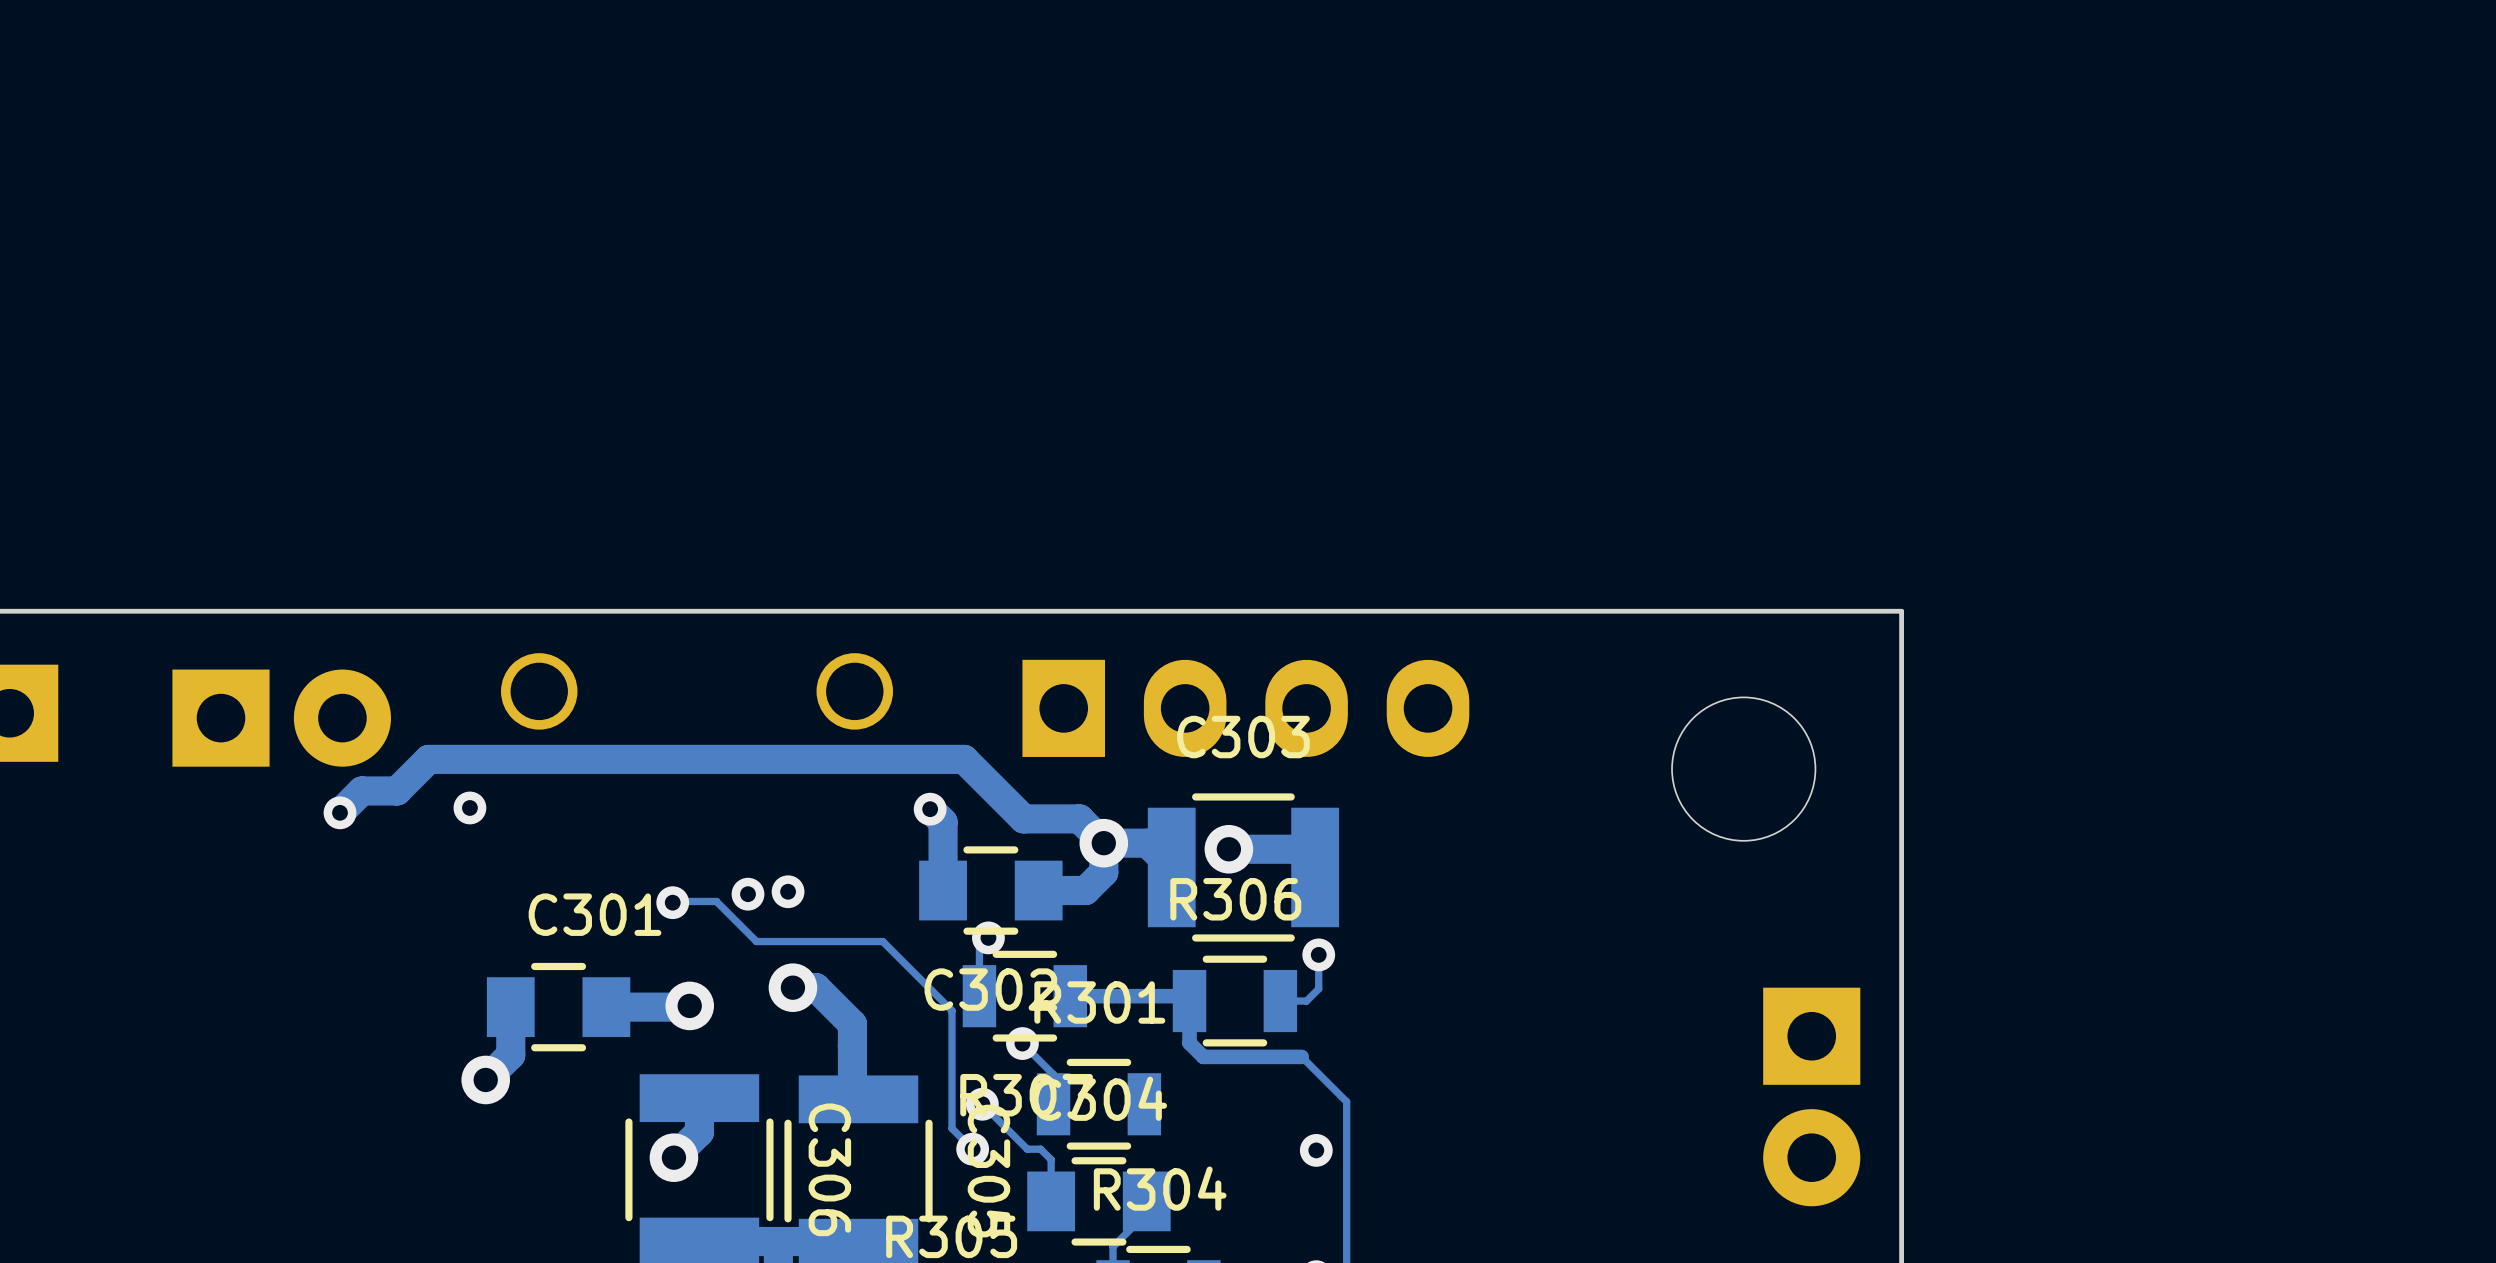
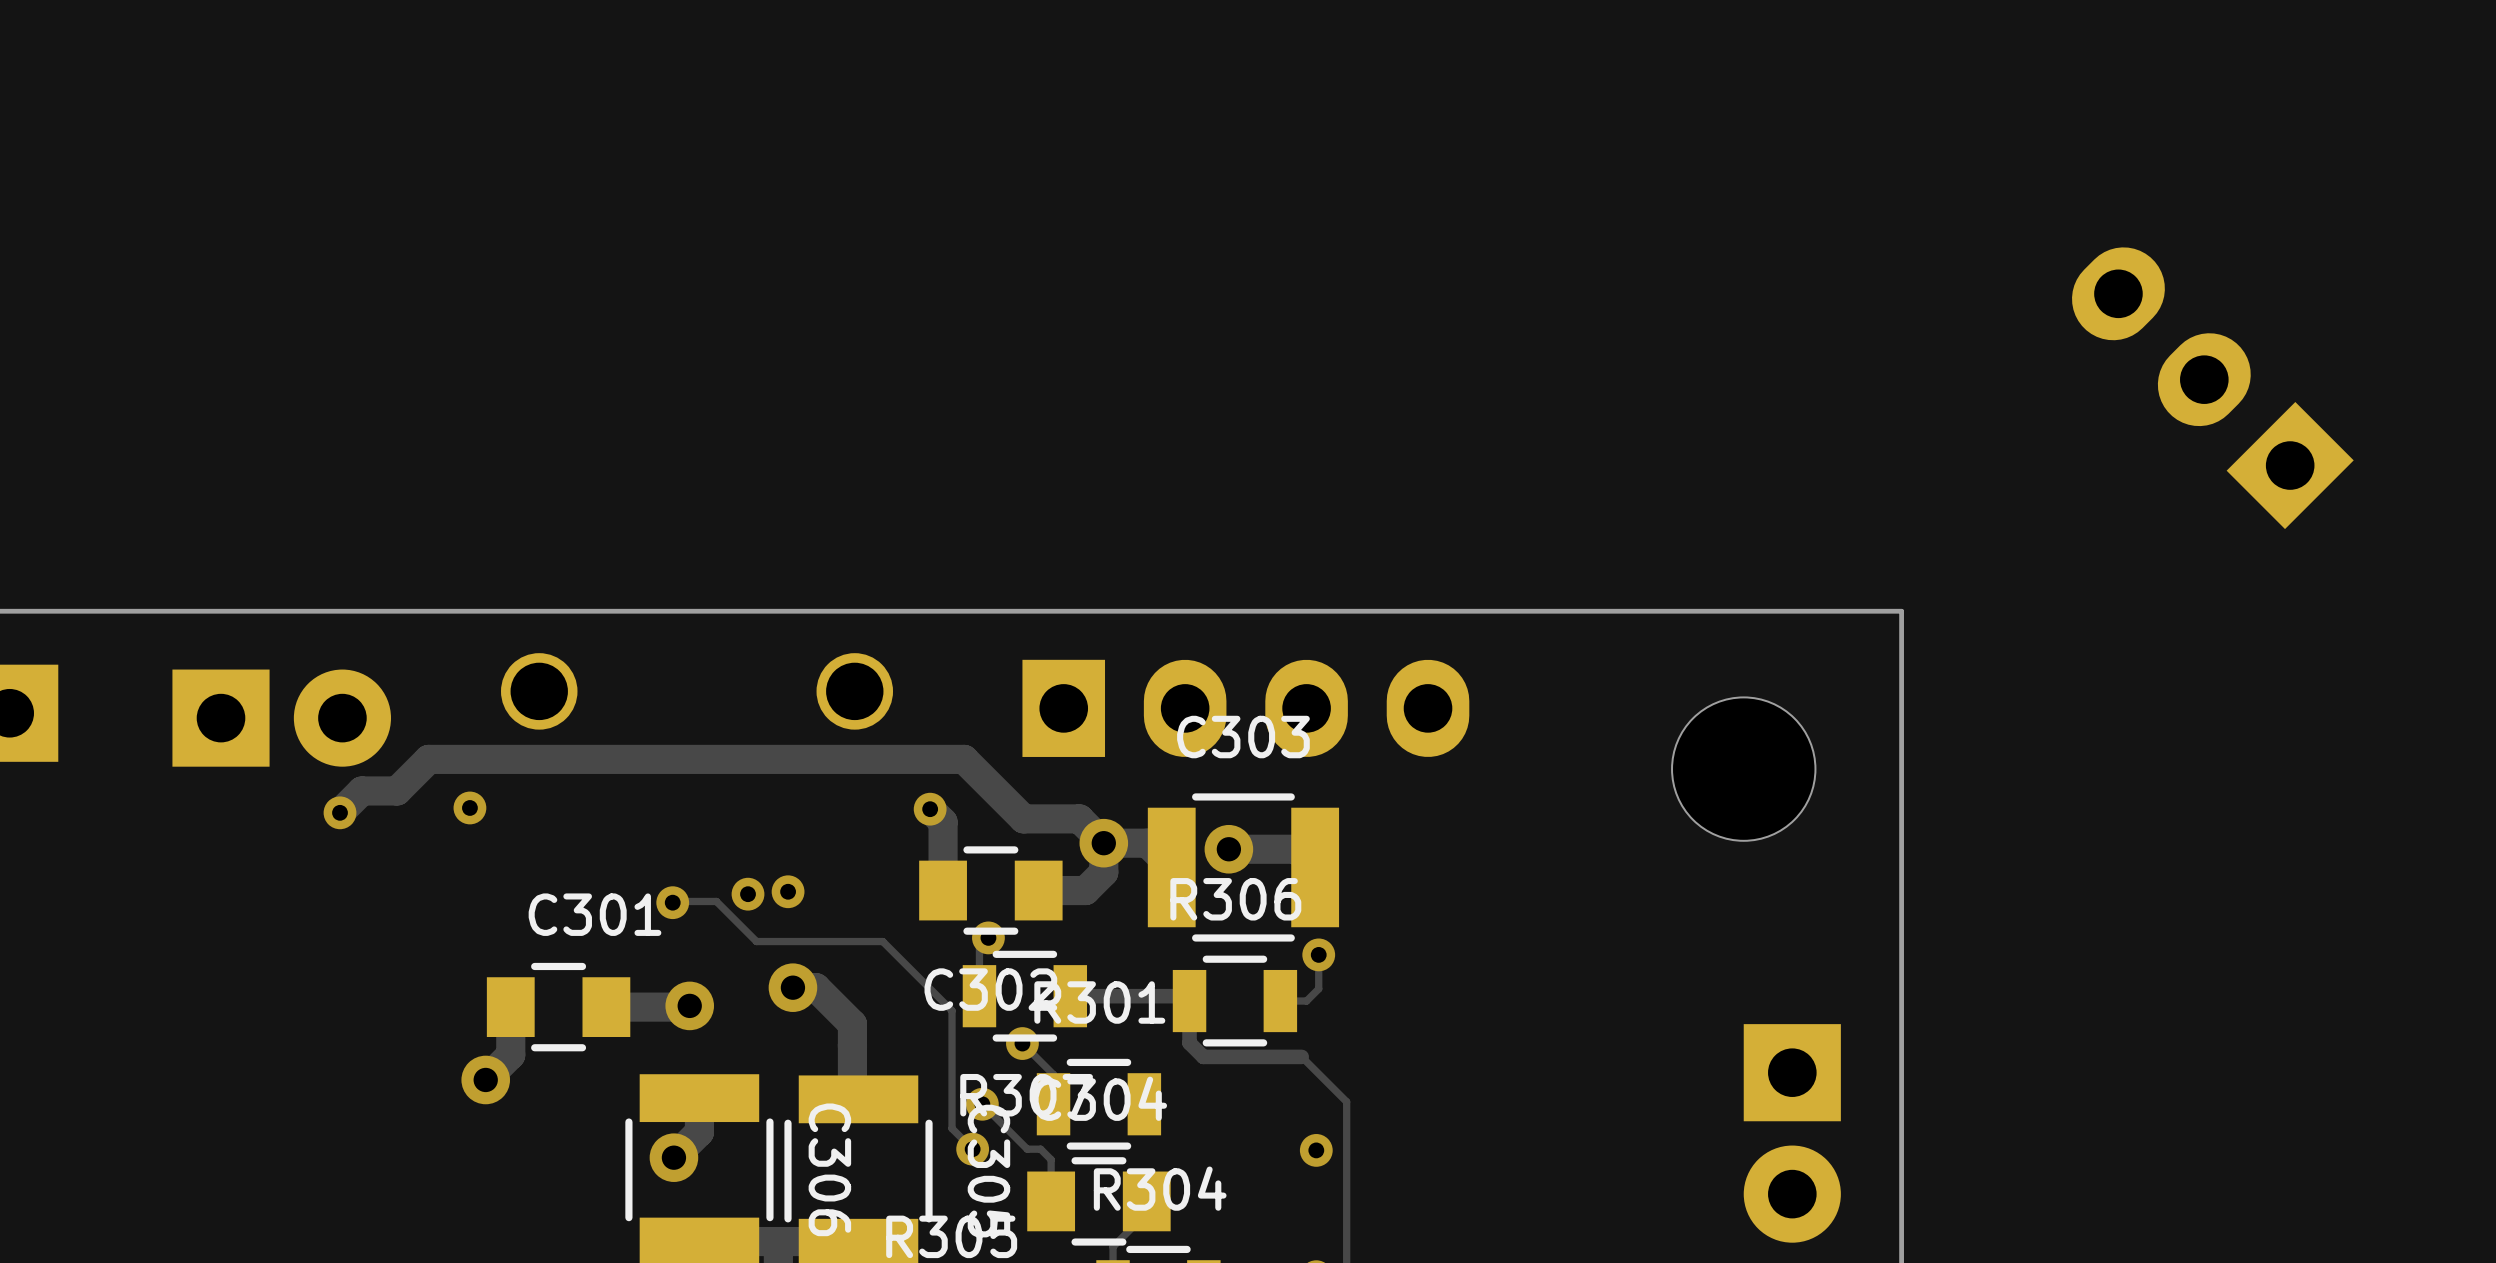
part: none -> (2212, 388)
part position: (1811, 1096) -> (1792, 1133)

